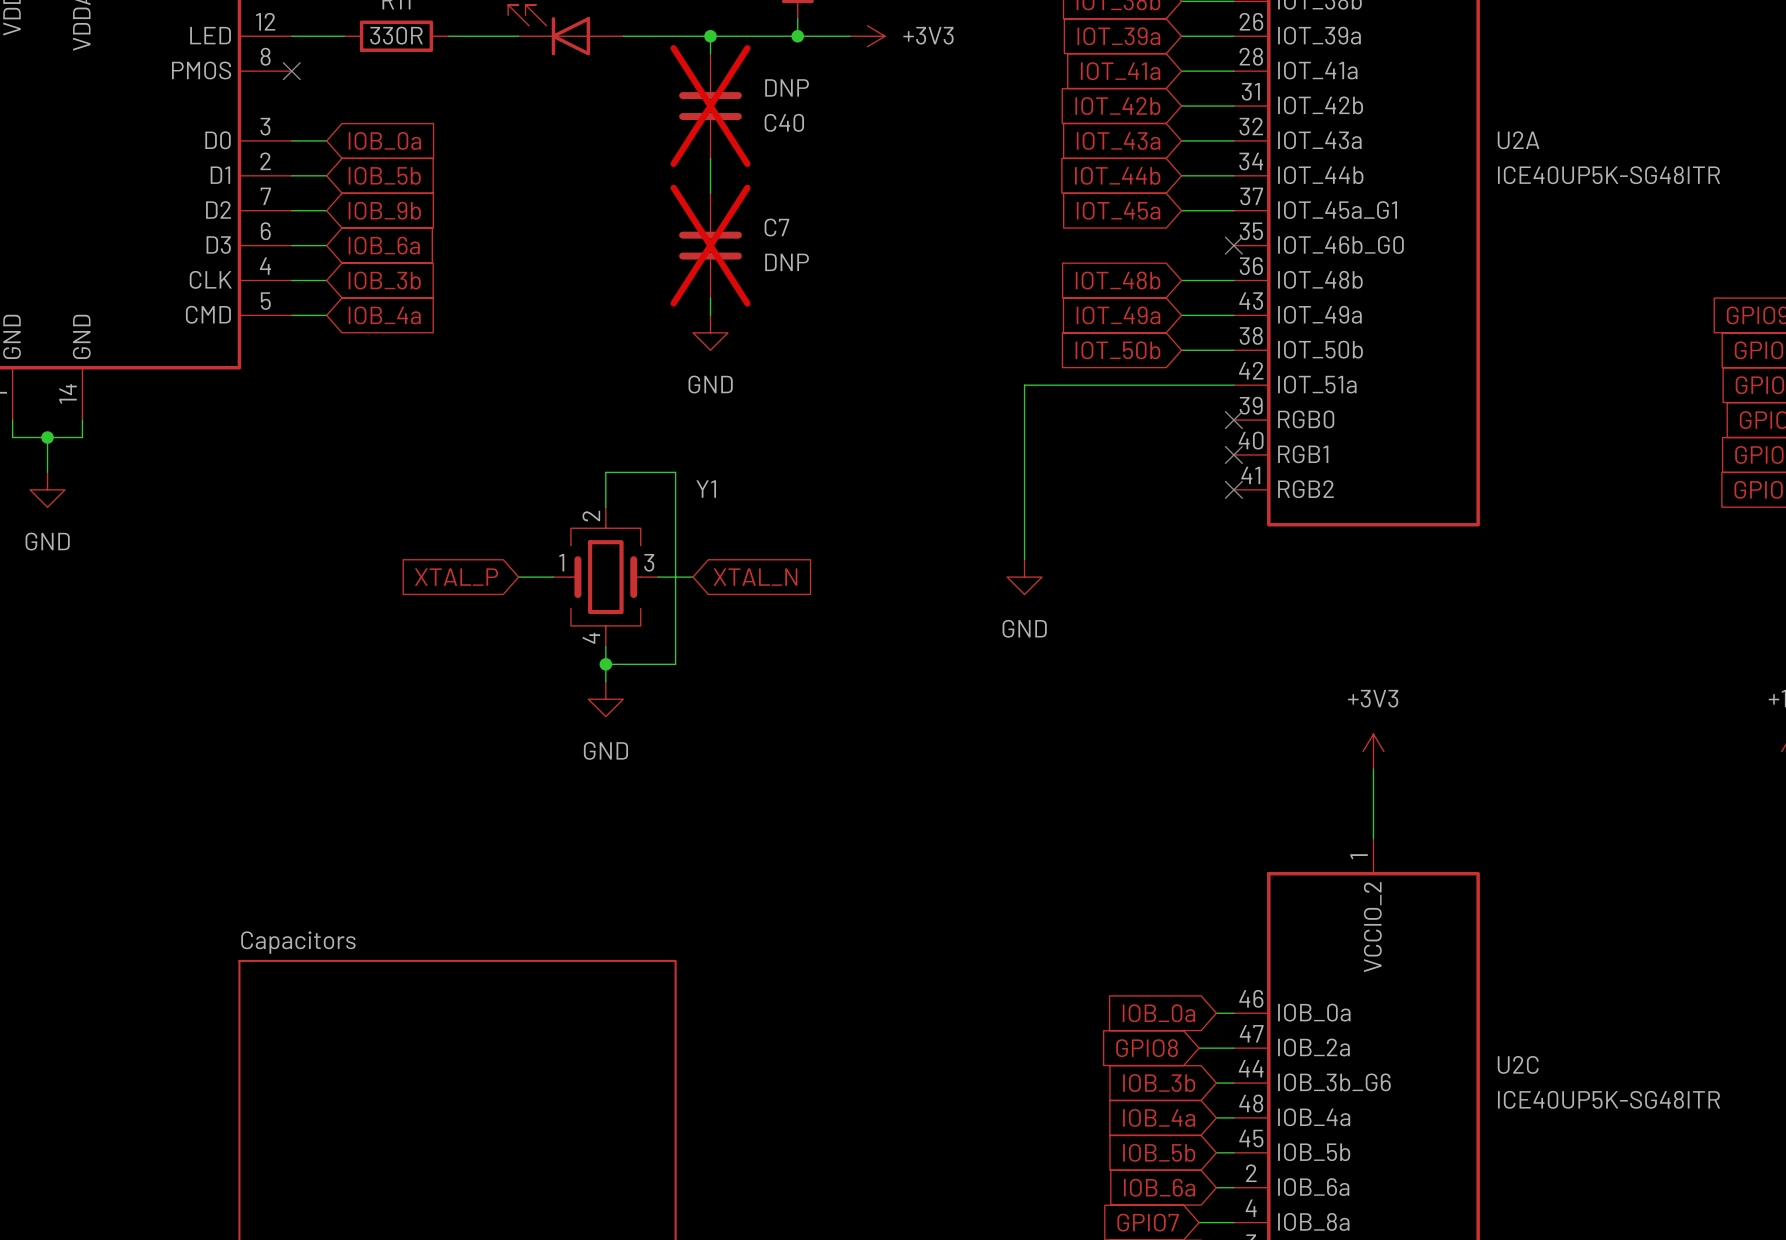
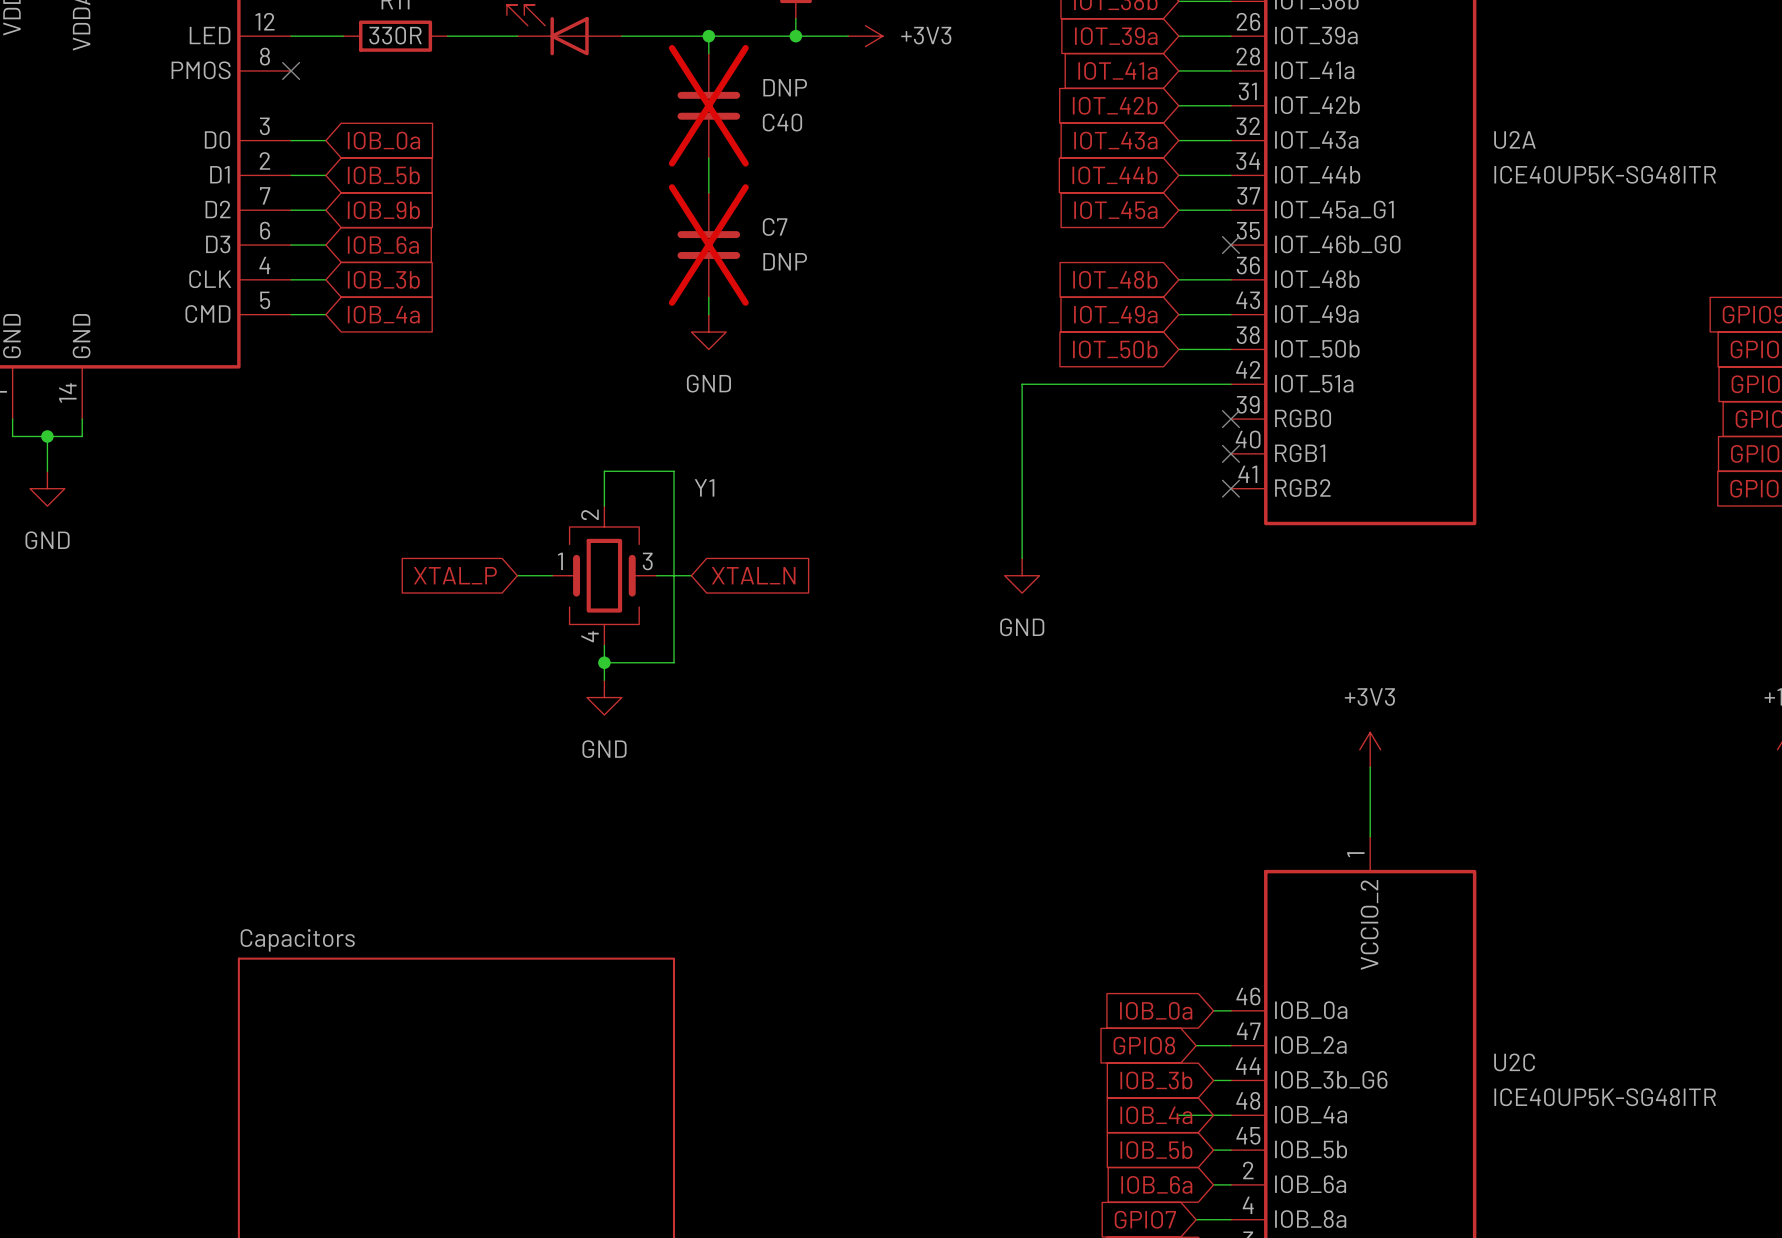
wire: none -> (1178, 1115) (1213, 1115)

